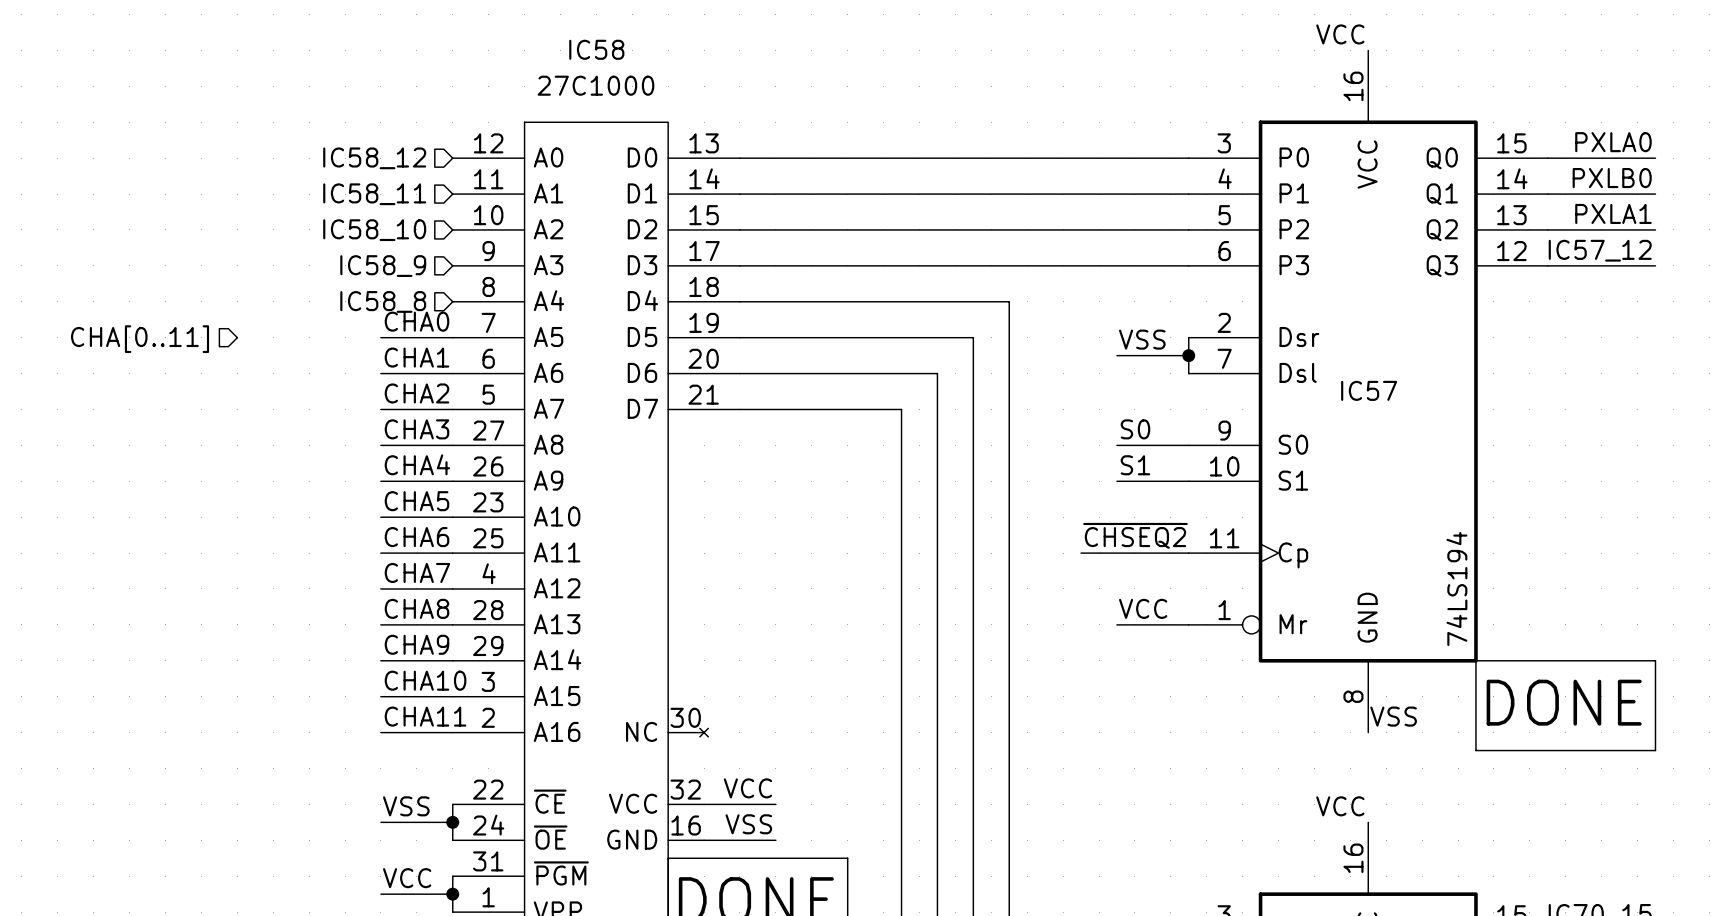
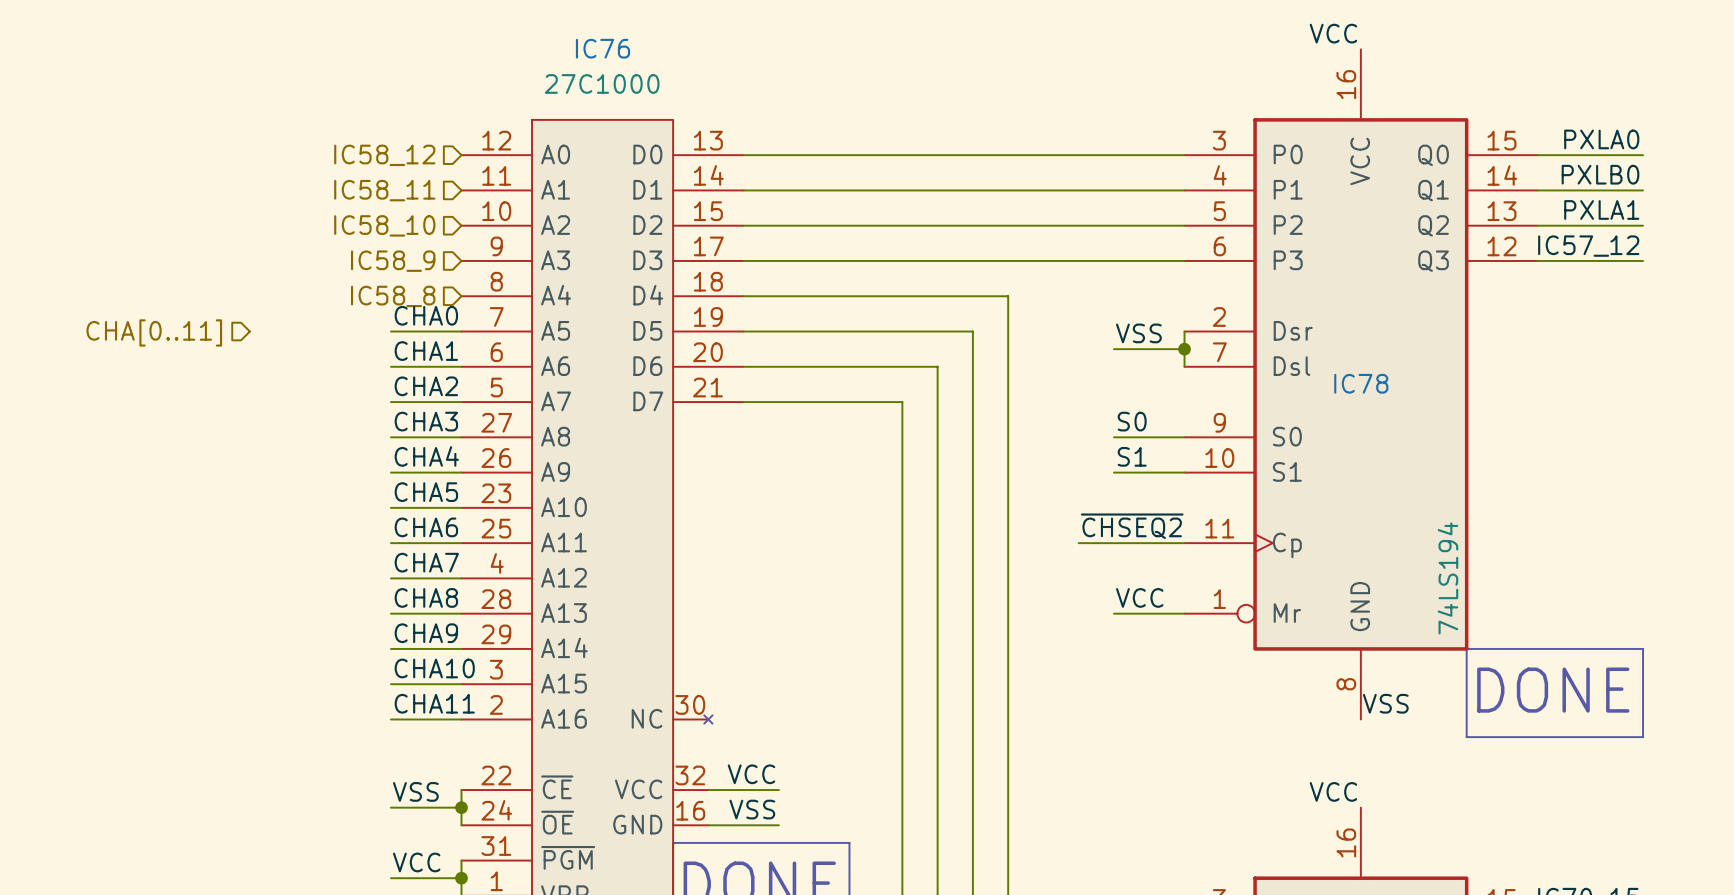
IC58 name: IC58 (596, 49) -> IC76 (602, 48)
IC57 name: IC57 (1369, 390) -> IC78 (1361, 383)

